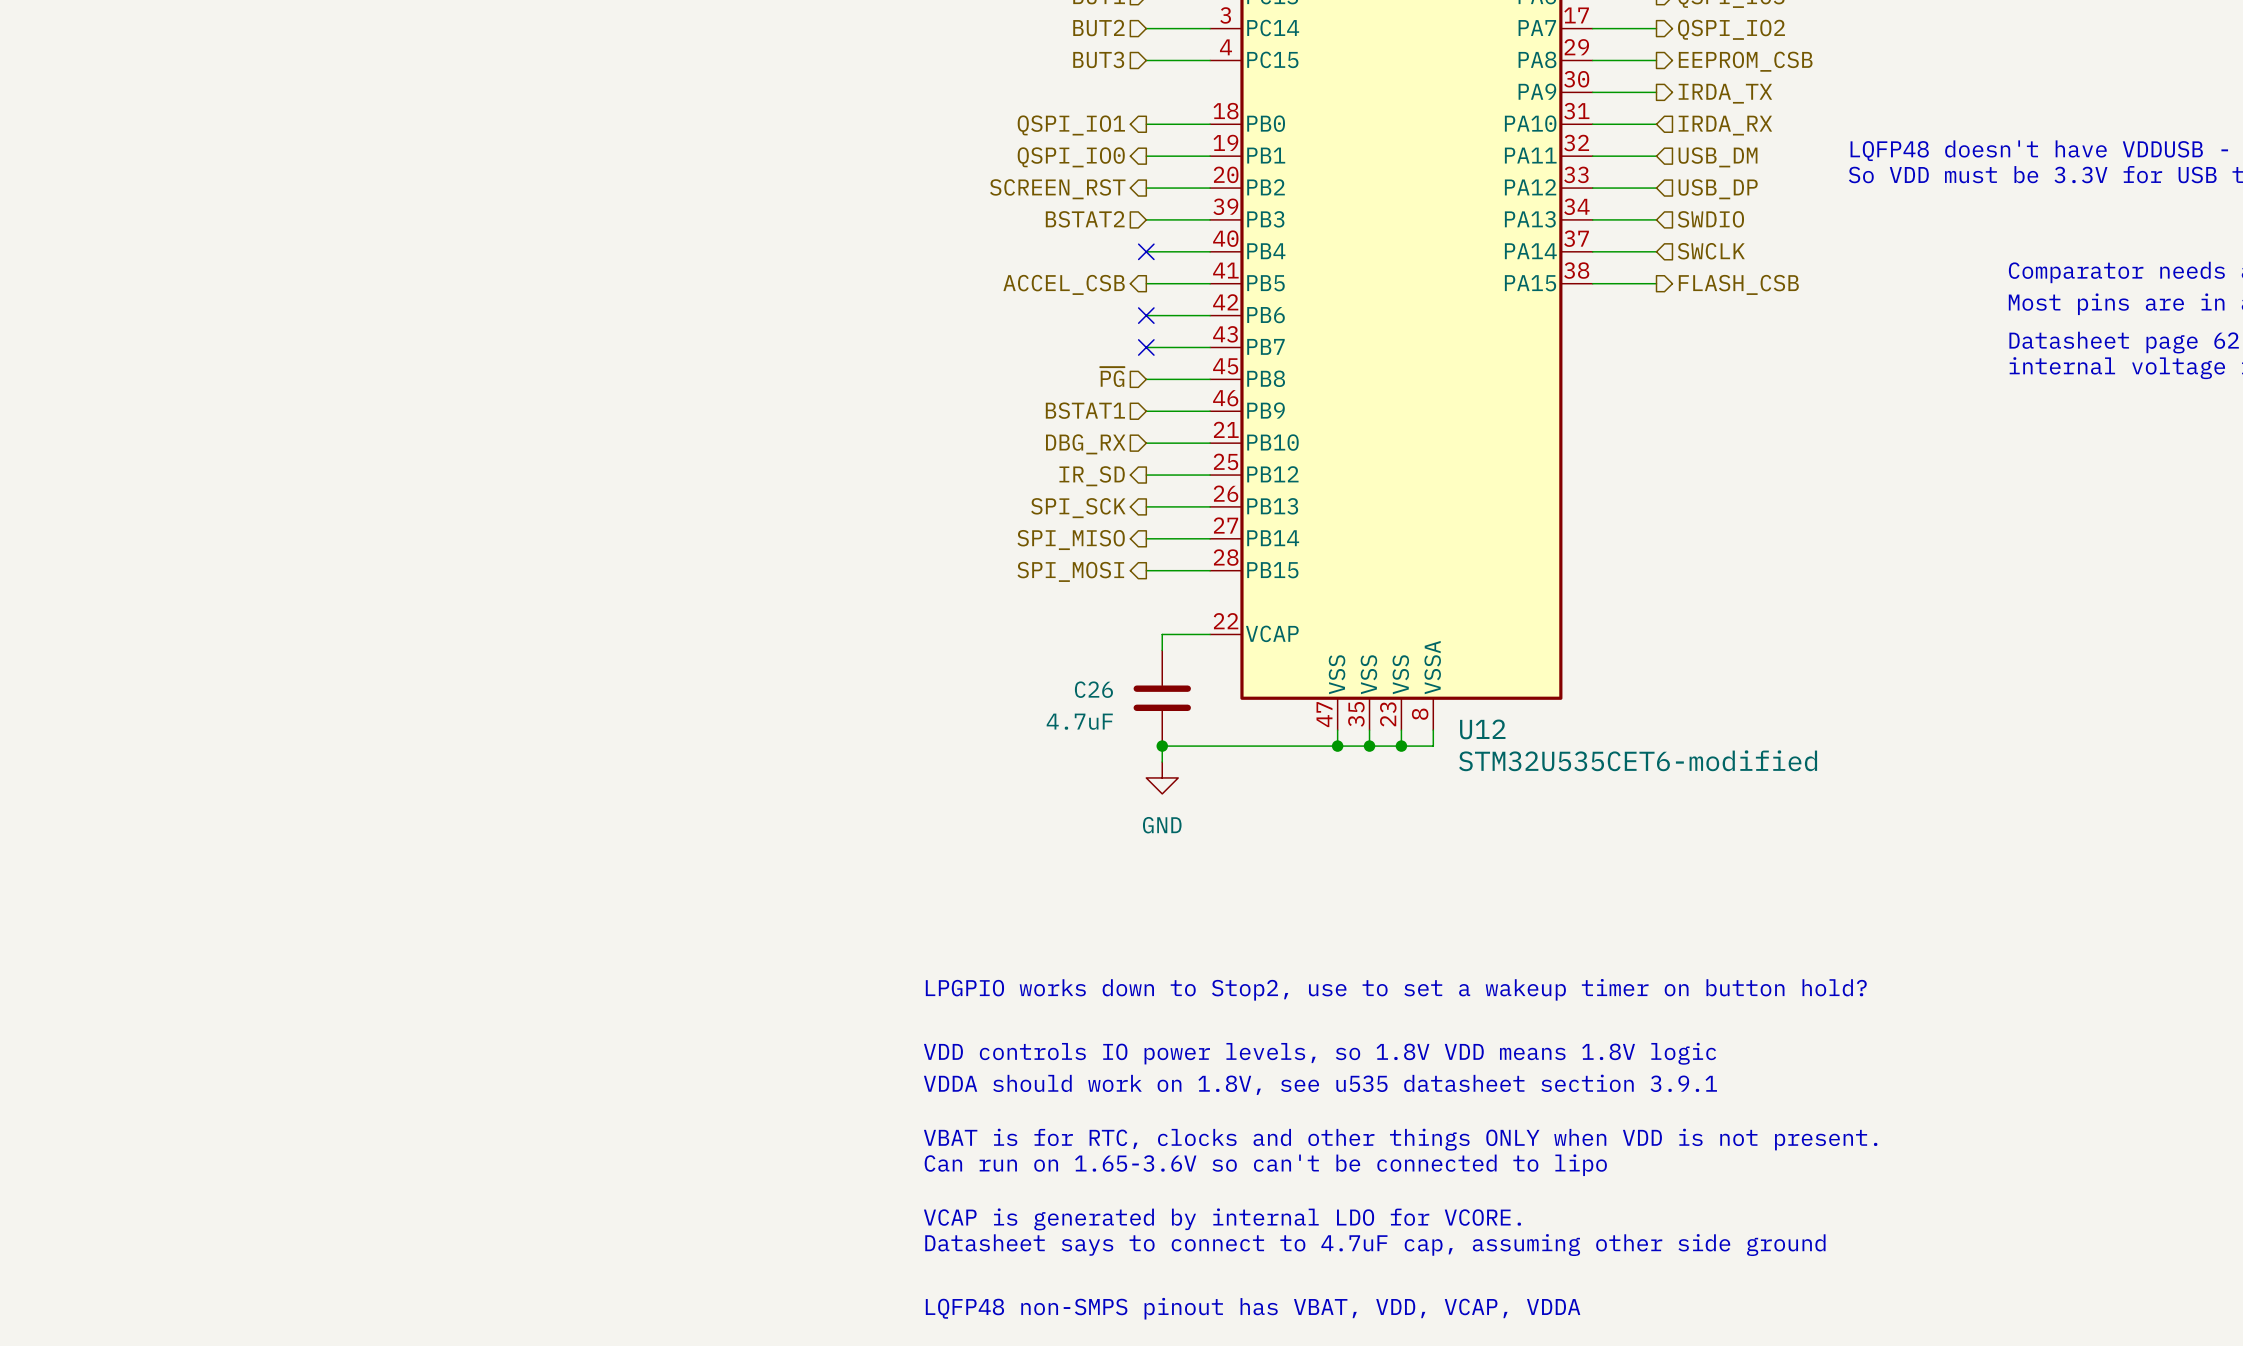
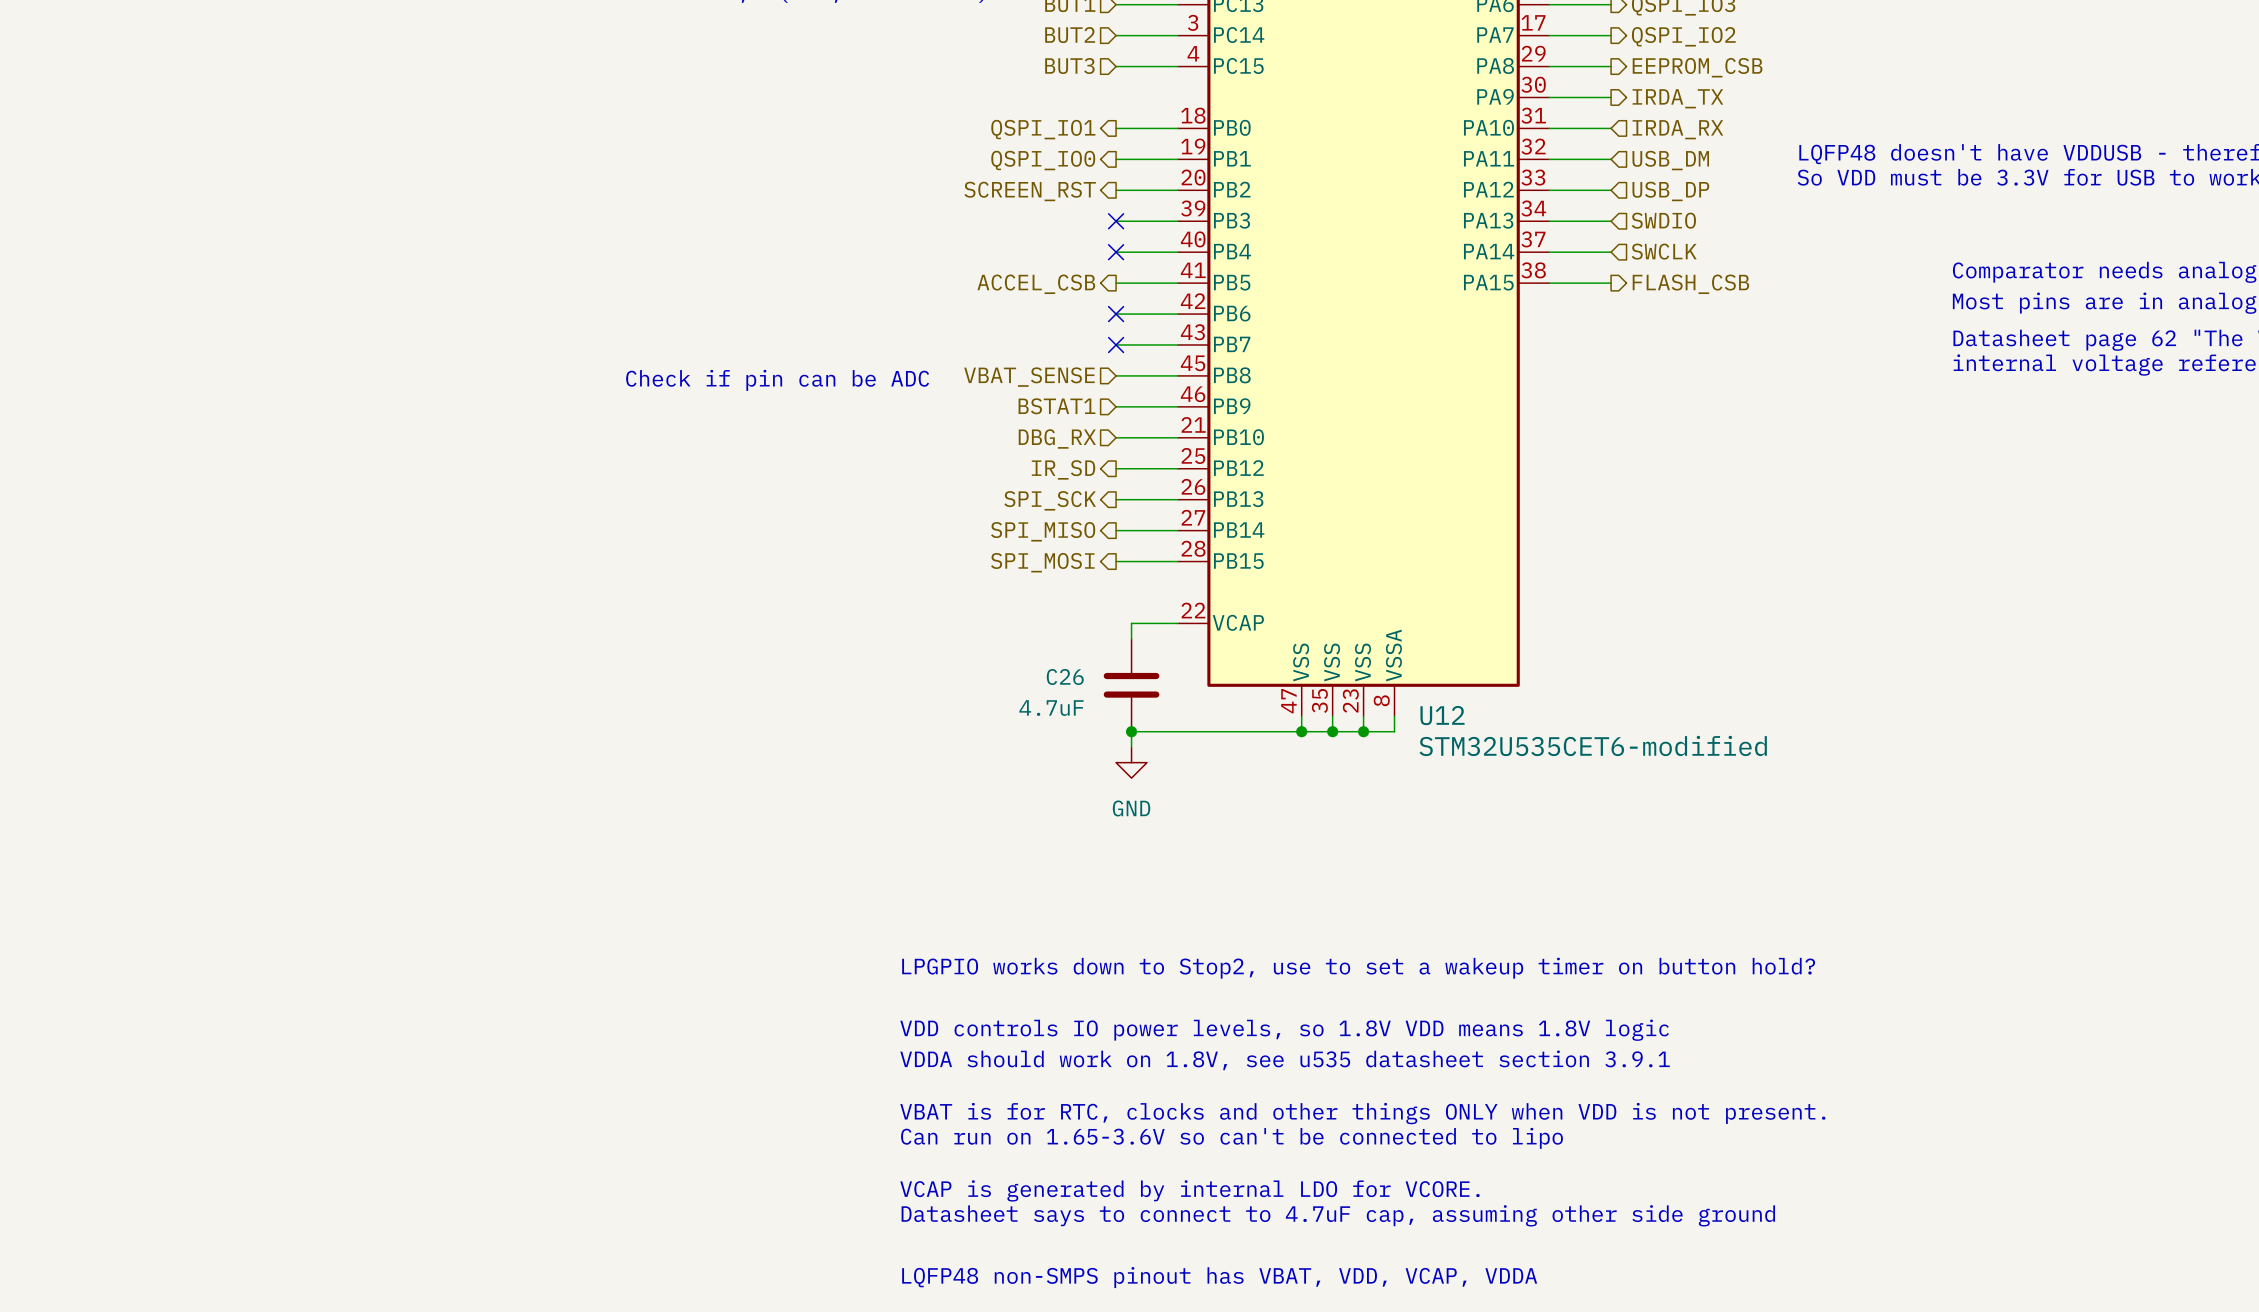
hierarchical label: BSTAT2 (1085, 219) -> none
no-connect mark: none -> (1116, 221)
hierarchical label: ~{PG} (1112, 377) -> VBAT_SENSE (1029, 377)
text: none -> Check if pin can be ADC (777, 380)

